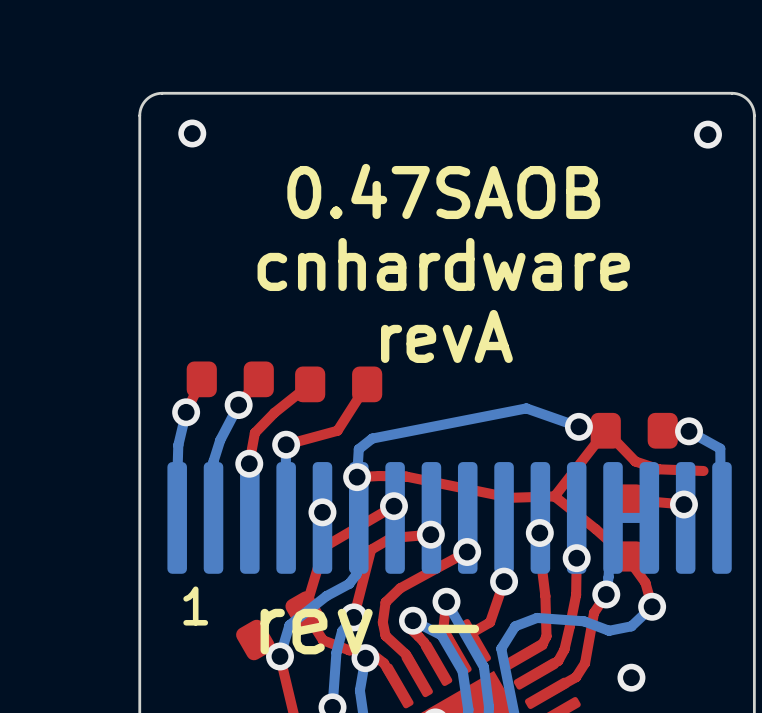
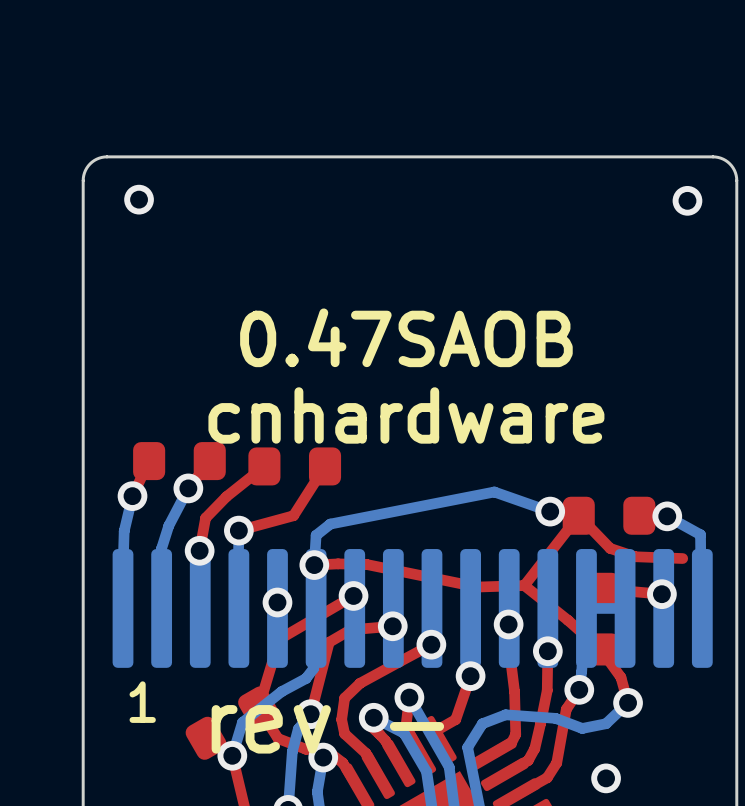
text: 0.47SAOB (443, 191) -> none
text: cnhardware (443, 264) -> 0.47SAOB (406, 337)
text: revA (446, 336) -> cnhardware (406, 415)

